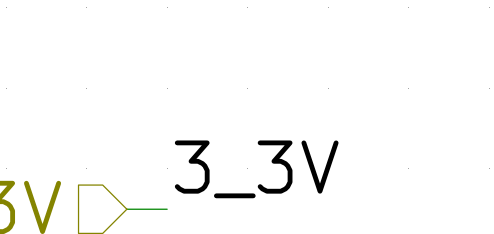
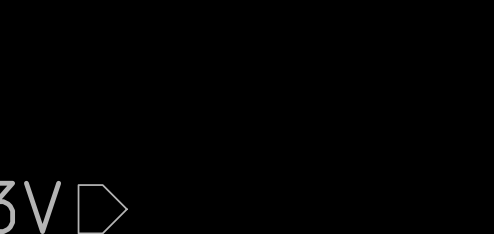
label: 3_3V (256, 169) -> none
wire: (126, 209) (167, 209) -> none

